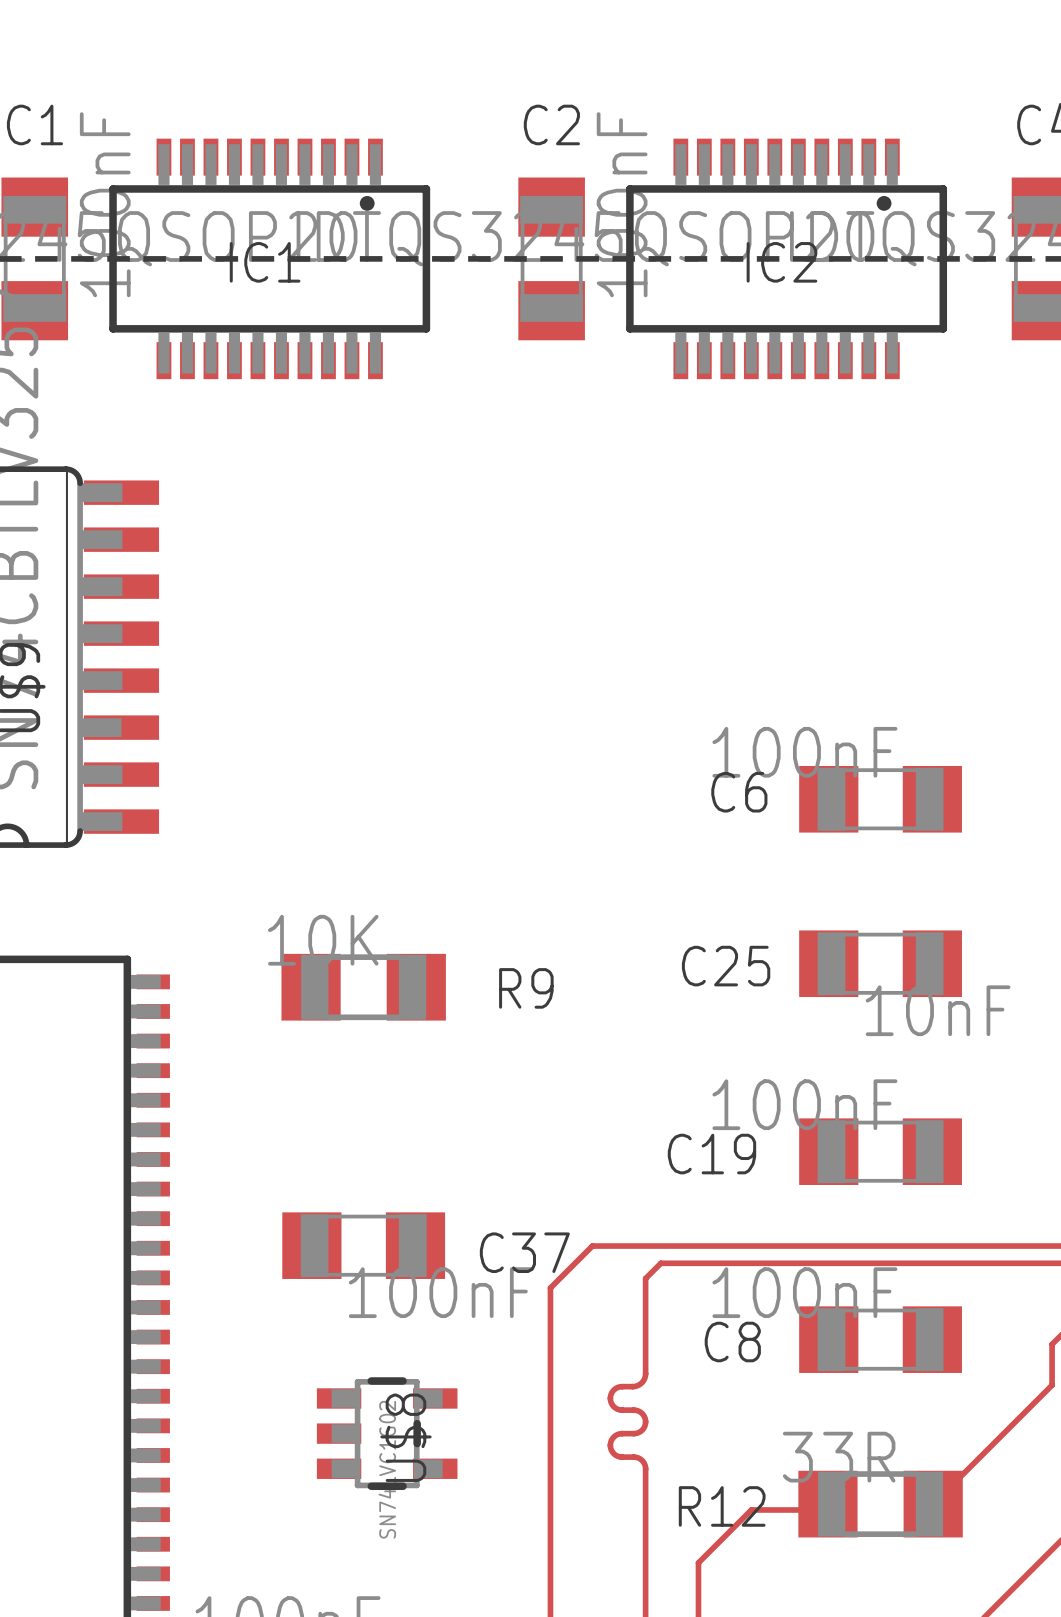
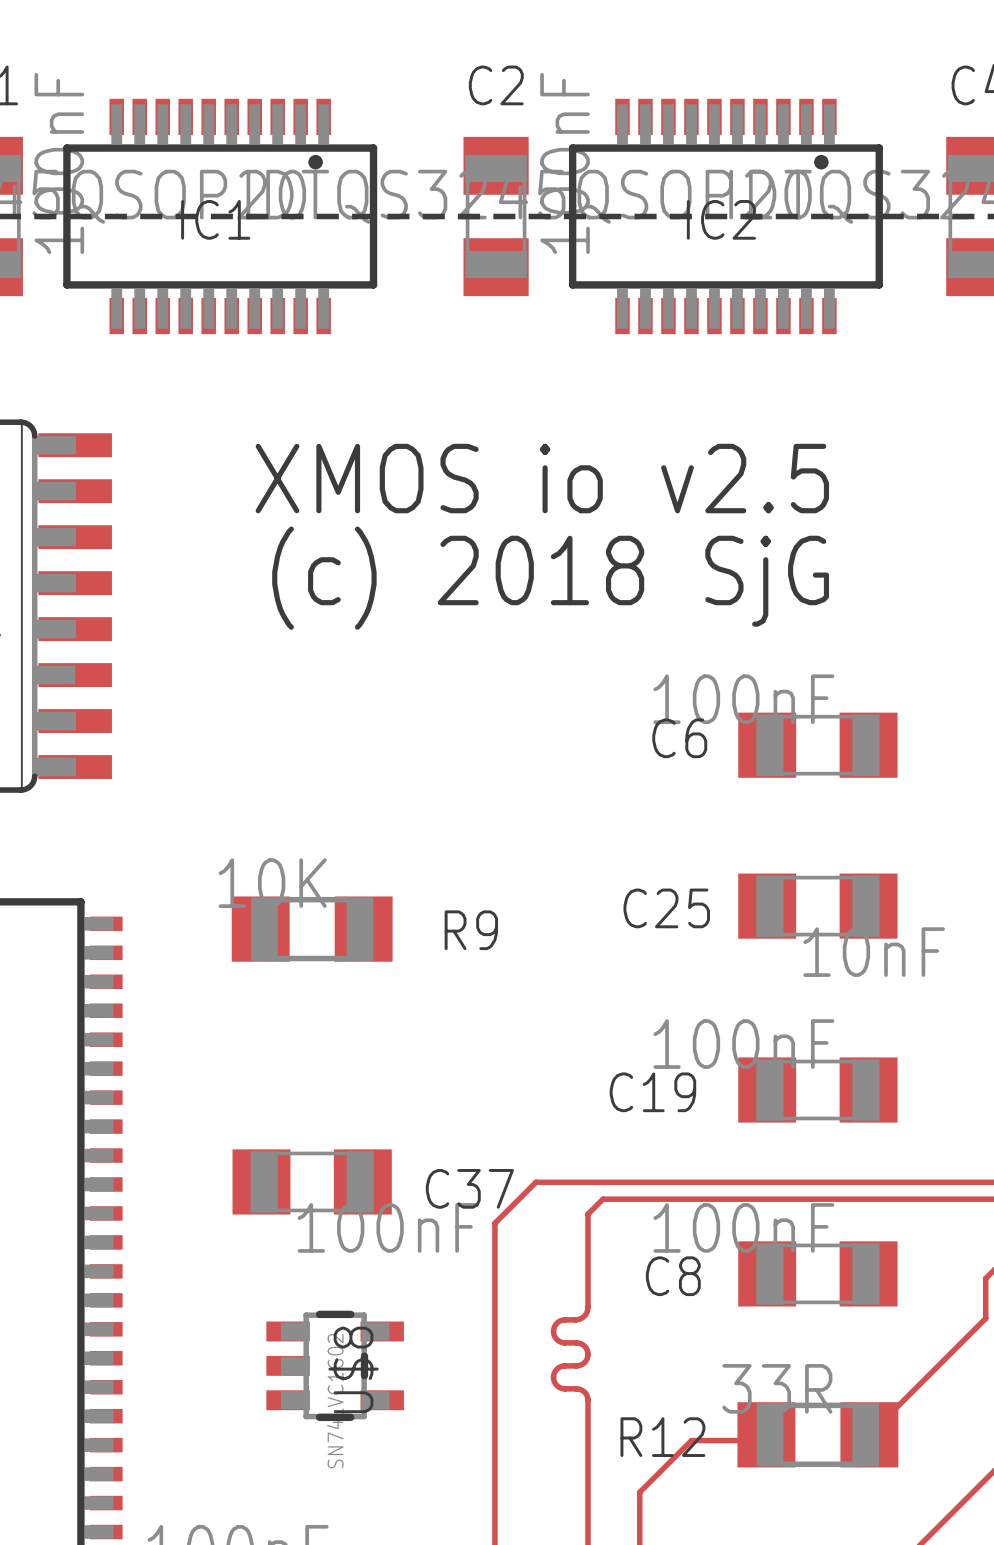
text: none -> XMOS io v2.5 (542, 478)
text: none -> (c) 2018 SjG (550, 578)

